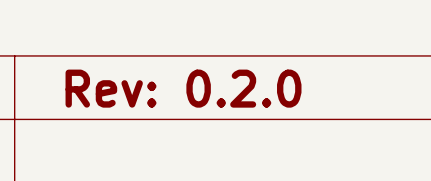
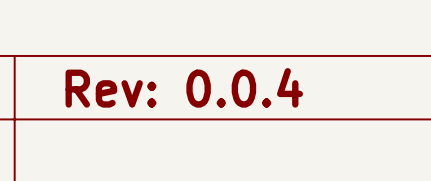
title block: Rev: 0.2.0 (183, 88) -> Rev: 0.0.4 (184, 87)

